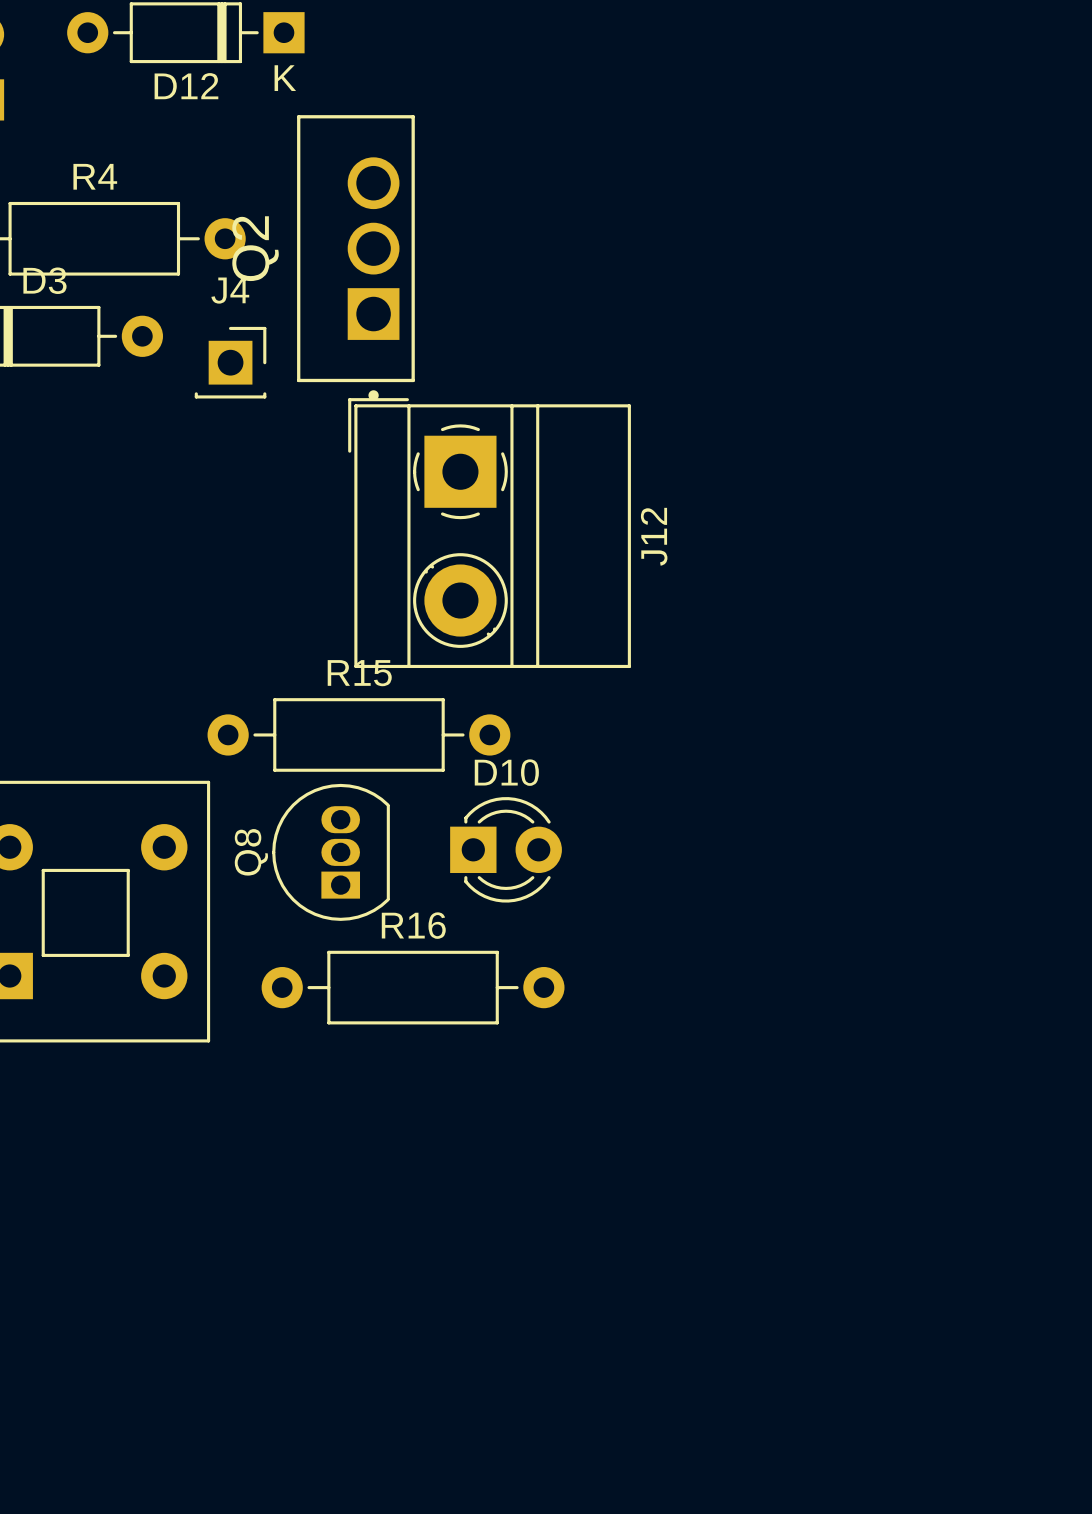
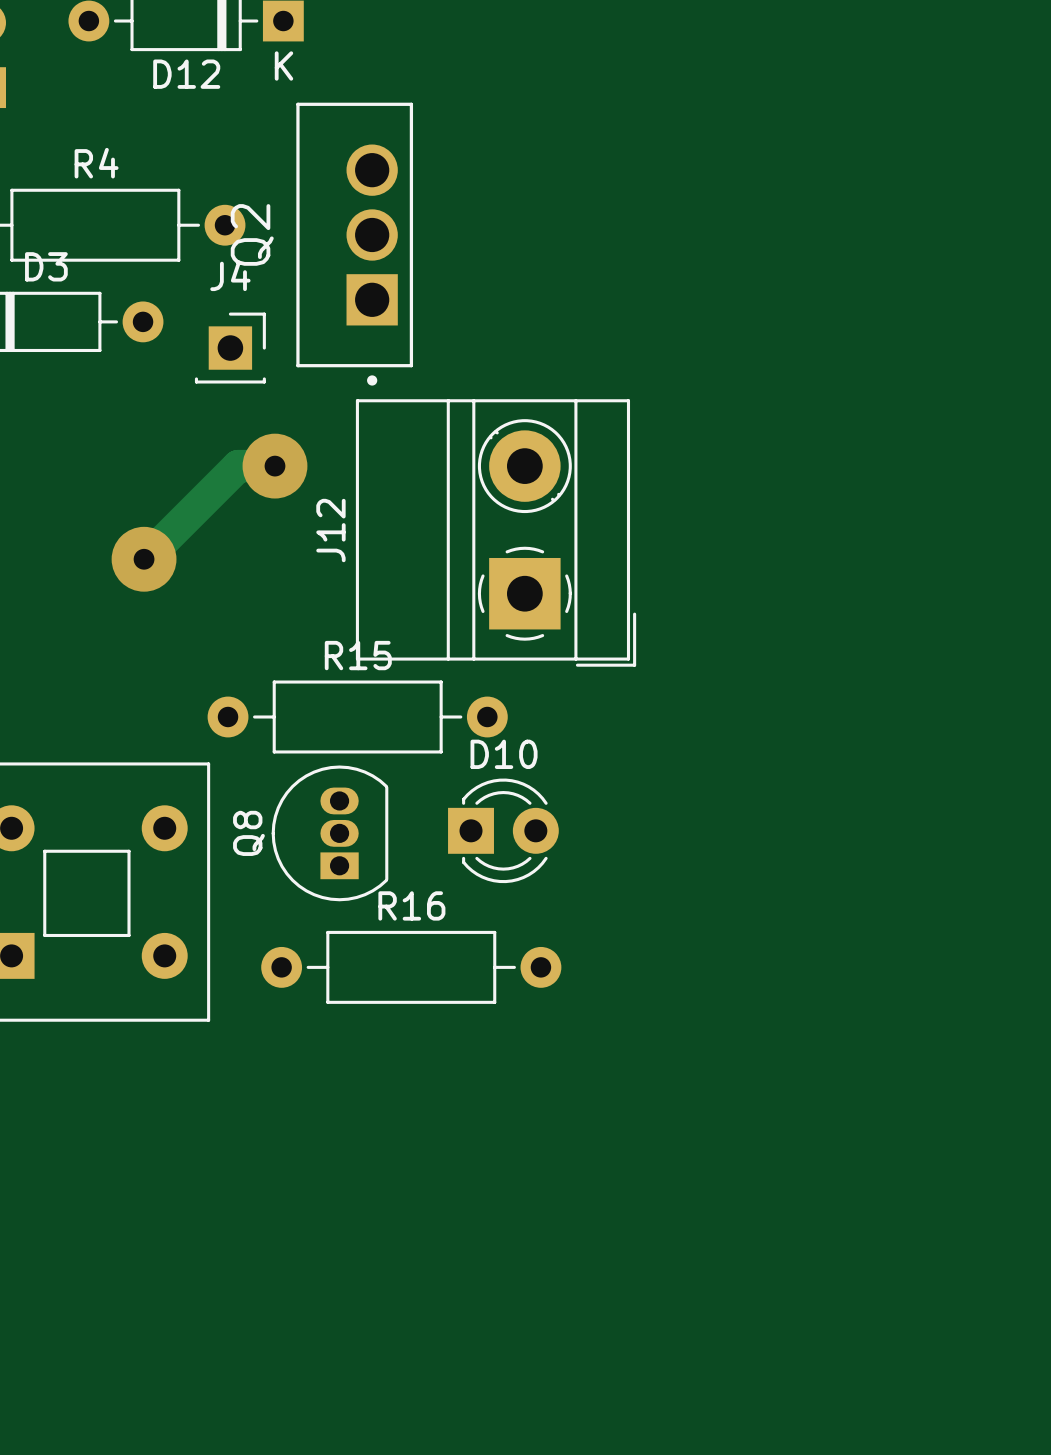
track: none -> (274, 466) (238, 466) (144, 559)
via: none -> (274, 466)
J12 rotation: 0° (489, 533) -> 180° (496, 532)
via: none -> (144, 559)

